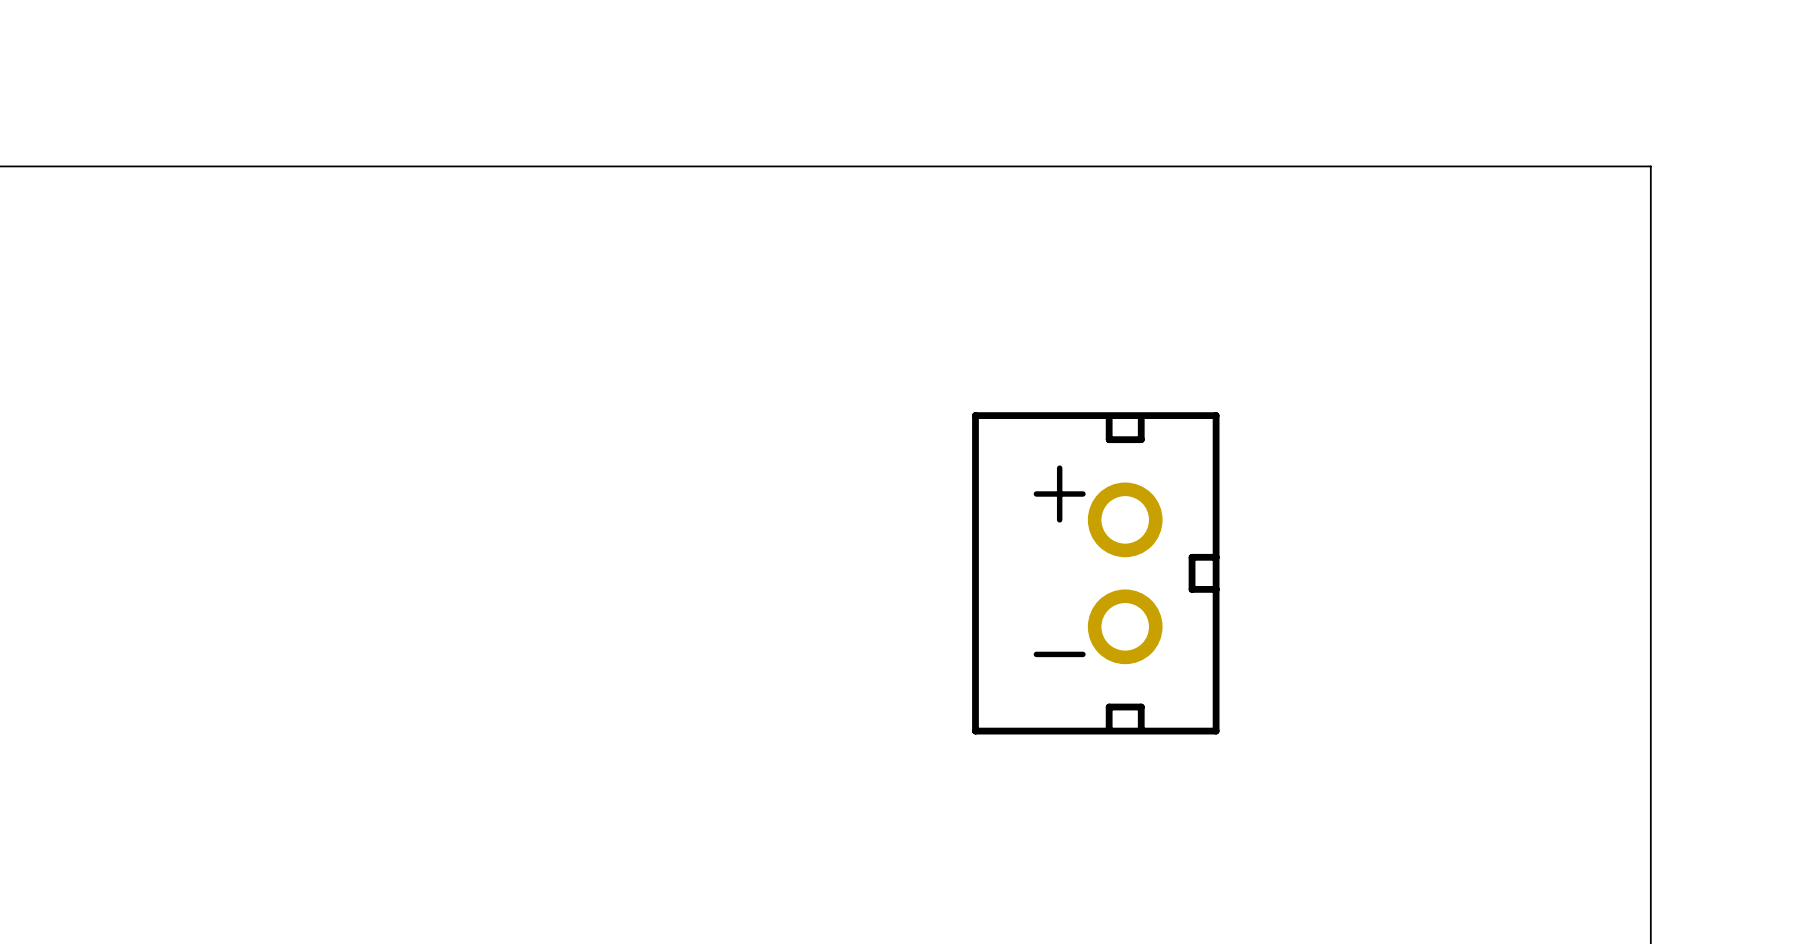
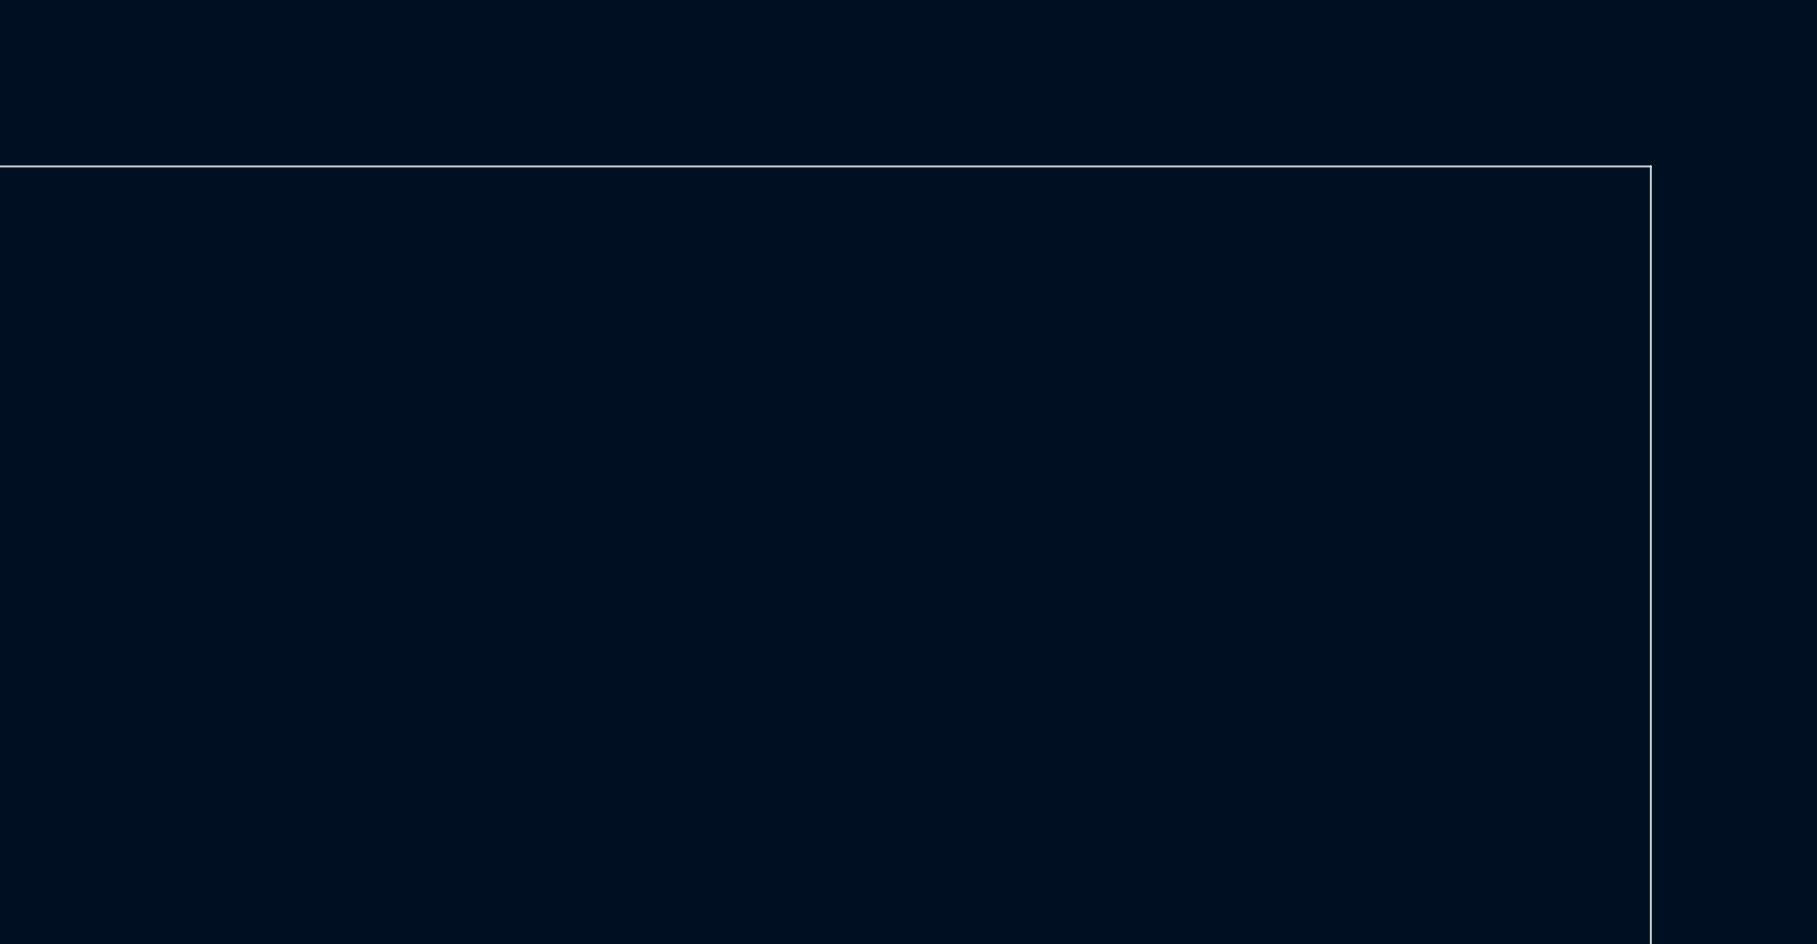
part: (1095, 573) -> none

